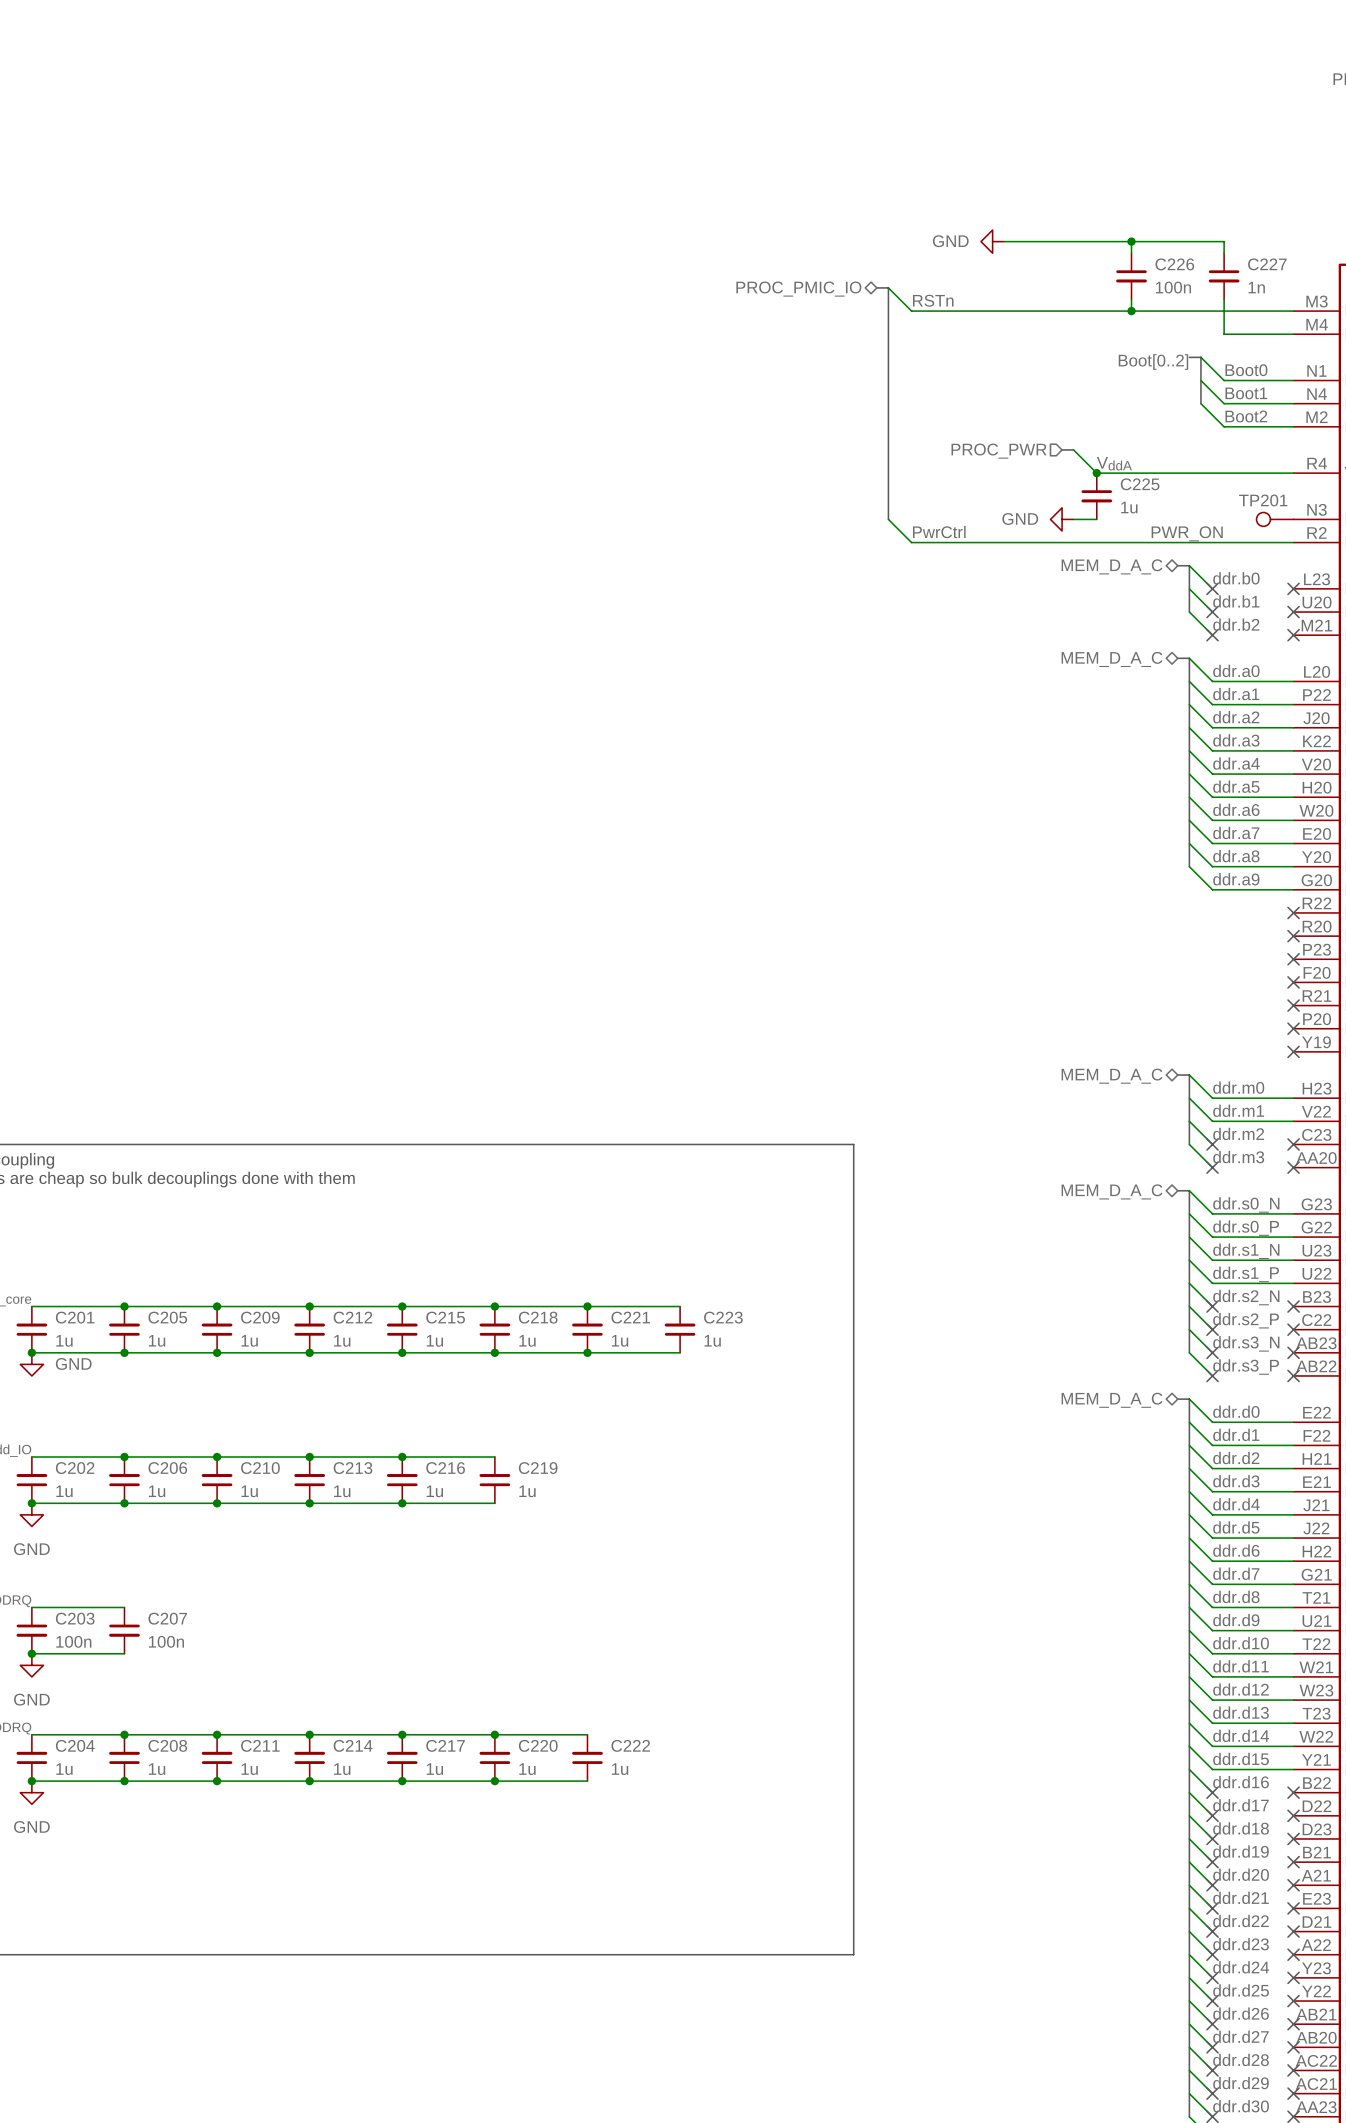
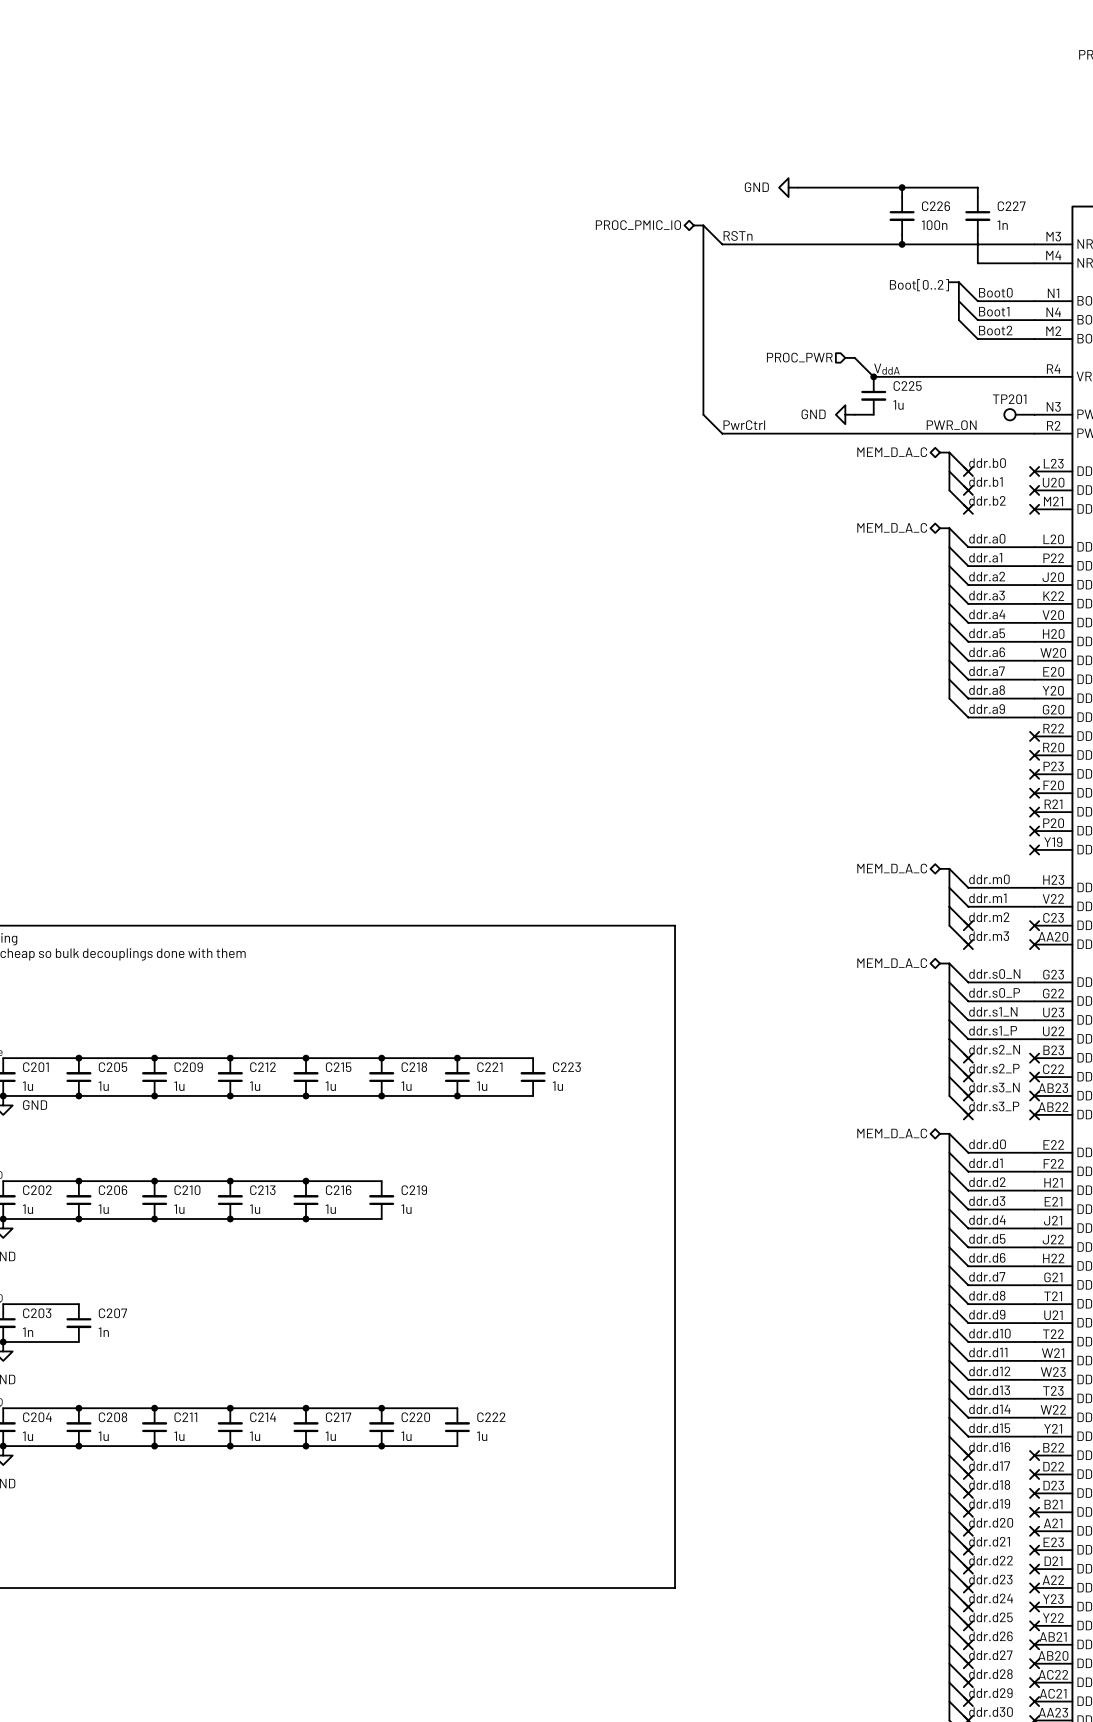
C203 value: 100n (73, 1641) -> 1n (28, 1332)
C207 value: 100n (166, 1641) -> 1n (103, 1332)

